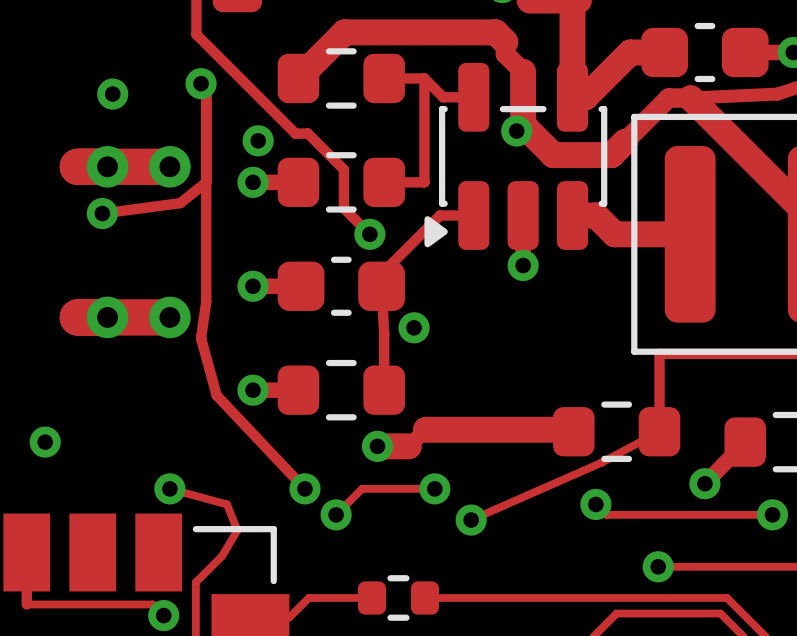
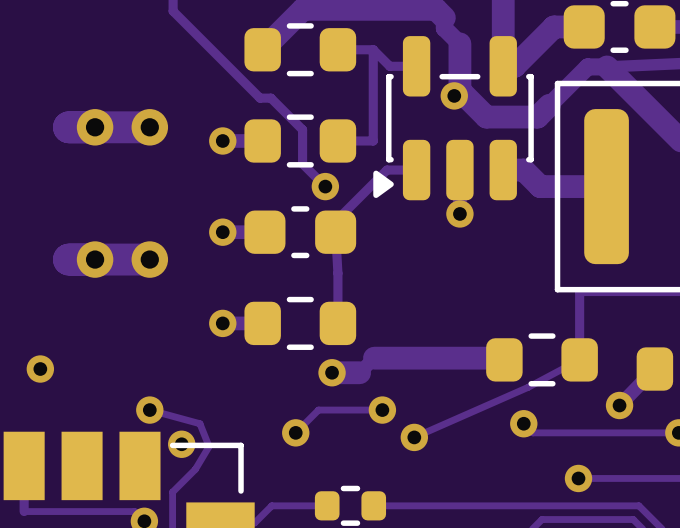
track: (201, 83) (206, 88) (206, 301) (201, 338) (216, 395) (304, 488) -> none
via: (201, 83) -> none
via: (112, 94) -> none
via: (258, 140) -> none
track: (206, 182) (180, 203) (102, 213) -> none
via: (102, 213) -> none
via: (414, 327) -> none
via position: (304, 488) -> (181, 444)

